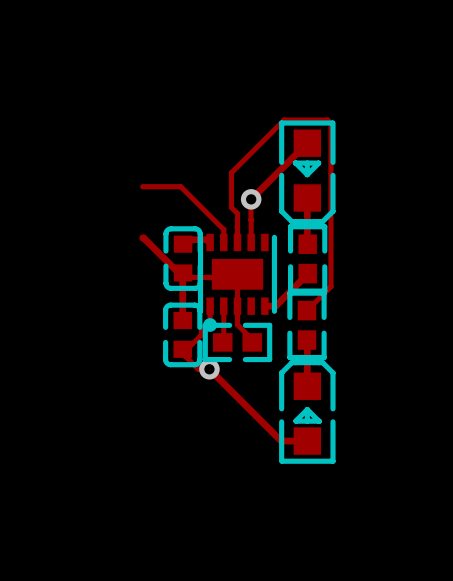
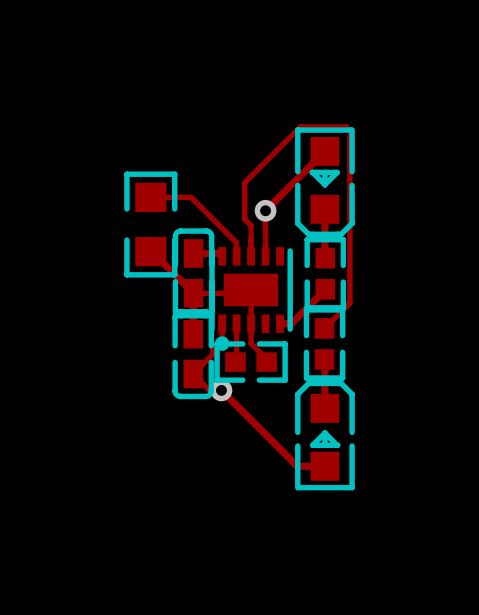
part: none -> (150, 224)
part footprint: [163, 226, 203, 291] -> [172, 228, 215, 319]
part footprint: [163, 302, 203, 368] -> [172, 309, 214, 400]

